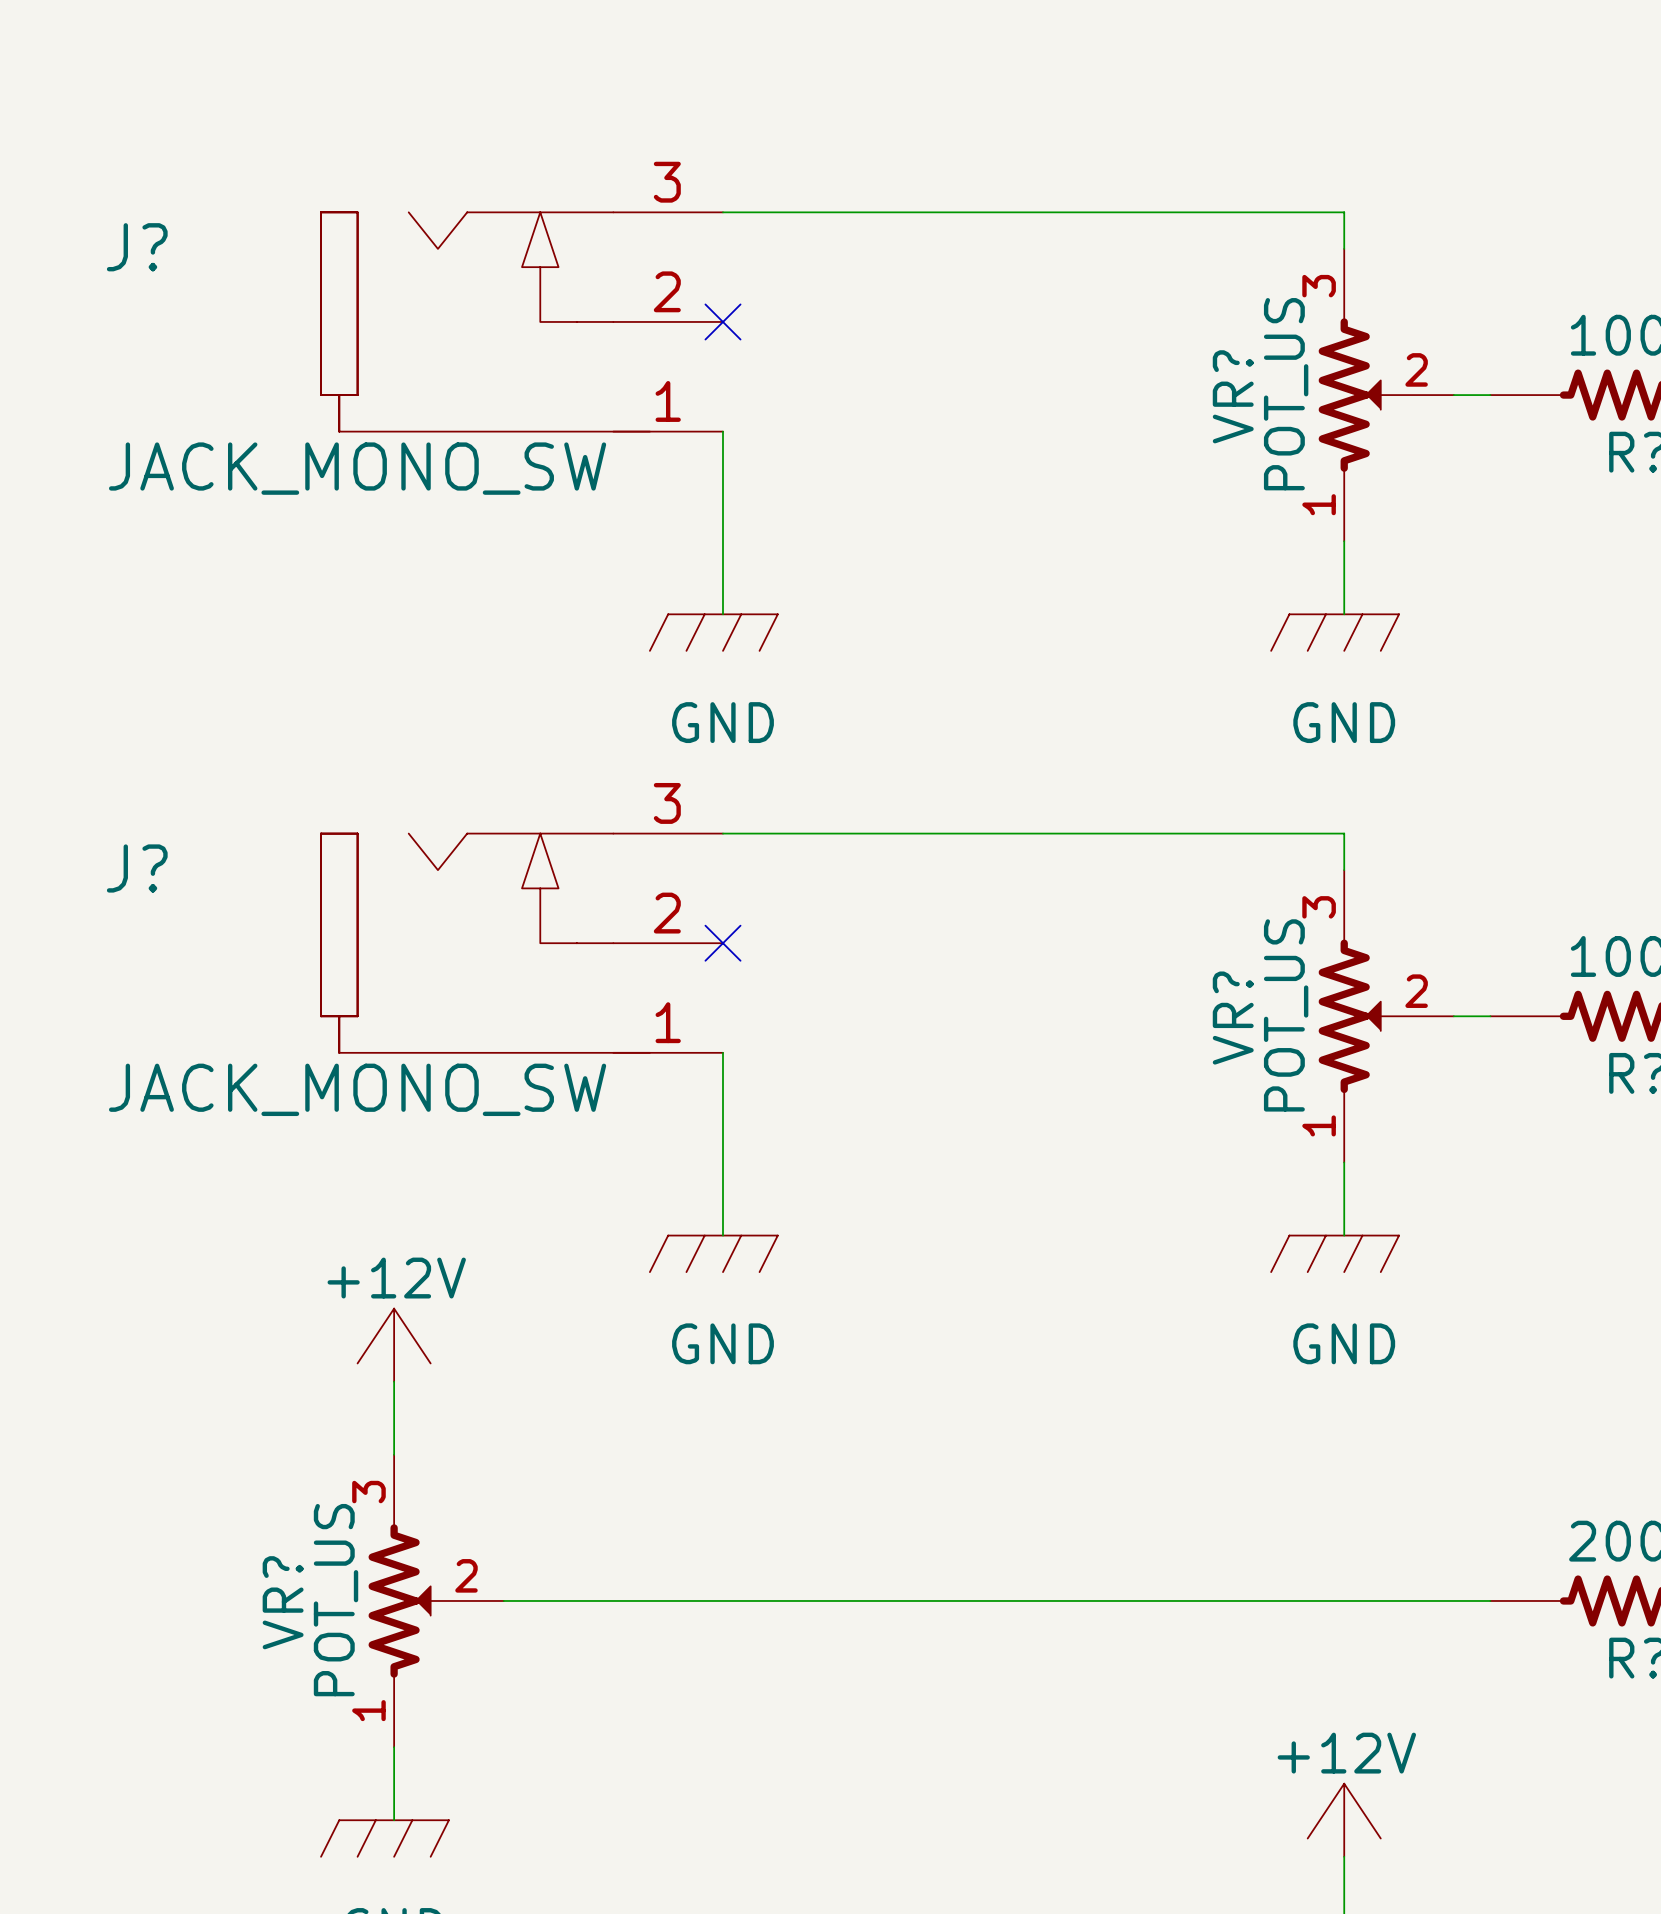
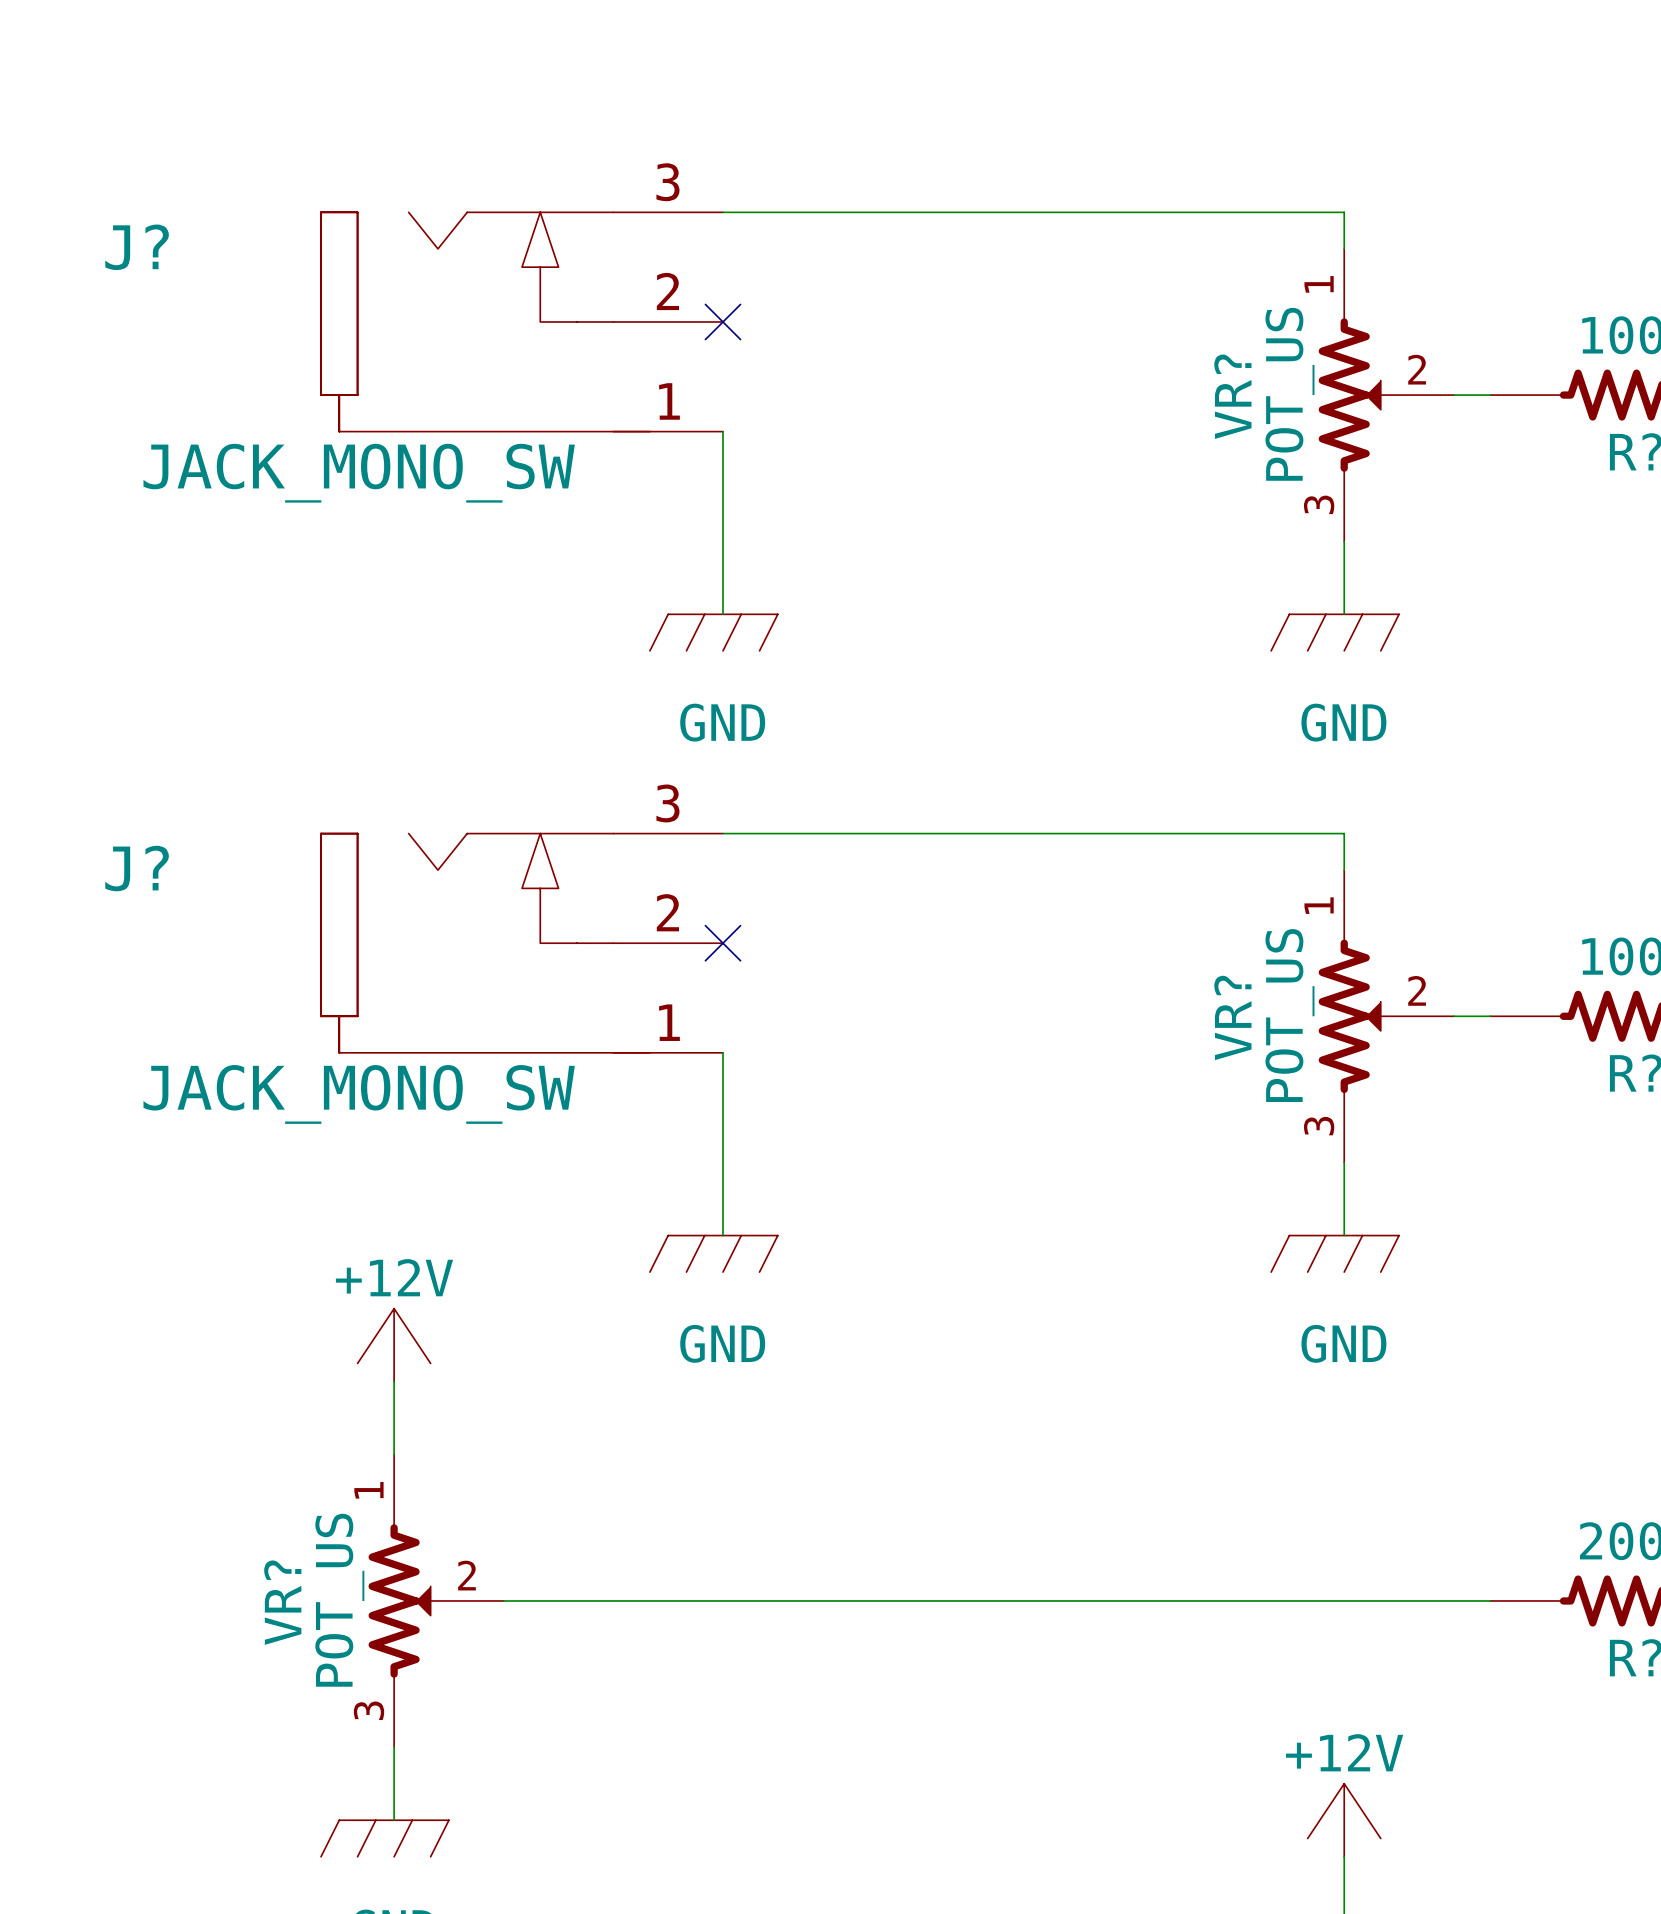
VR? flip: as is (1349, 395) -> up-down (1349, 395)
VR? flip: as is (1349, 1016) -> up-down (1349, 1016)
VR? flip: as is (399, 1600) -> up-down (399, 1600)

